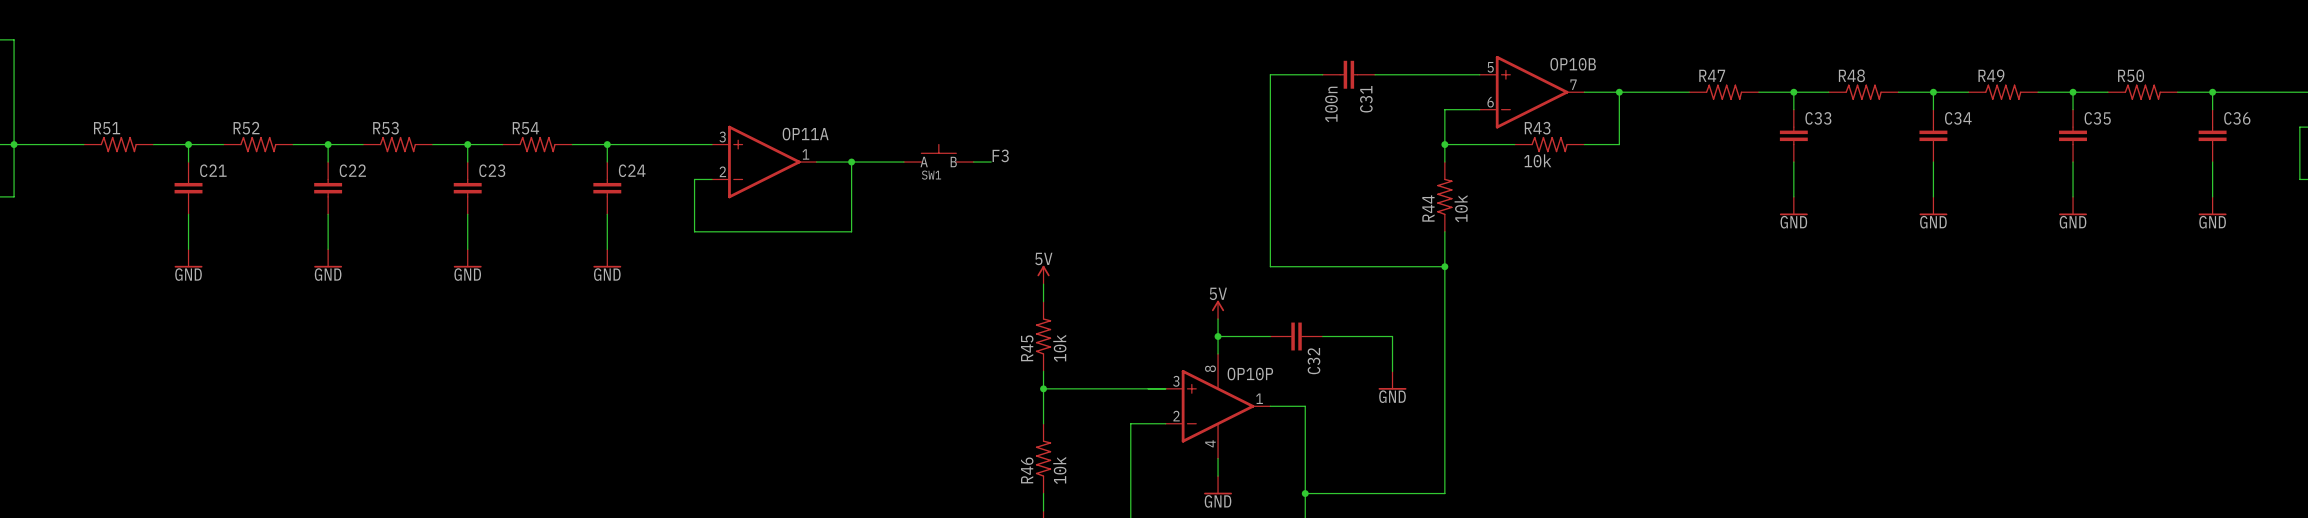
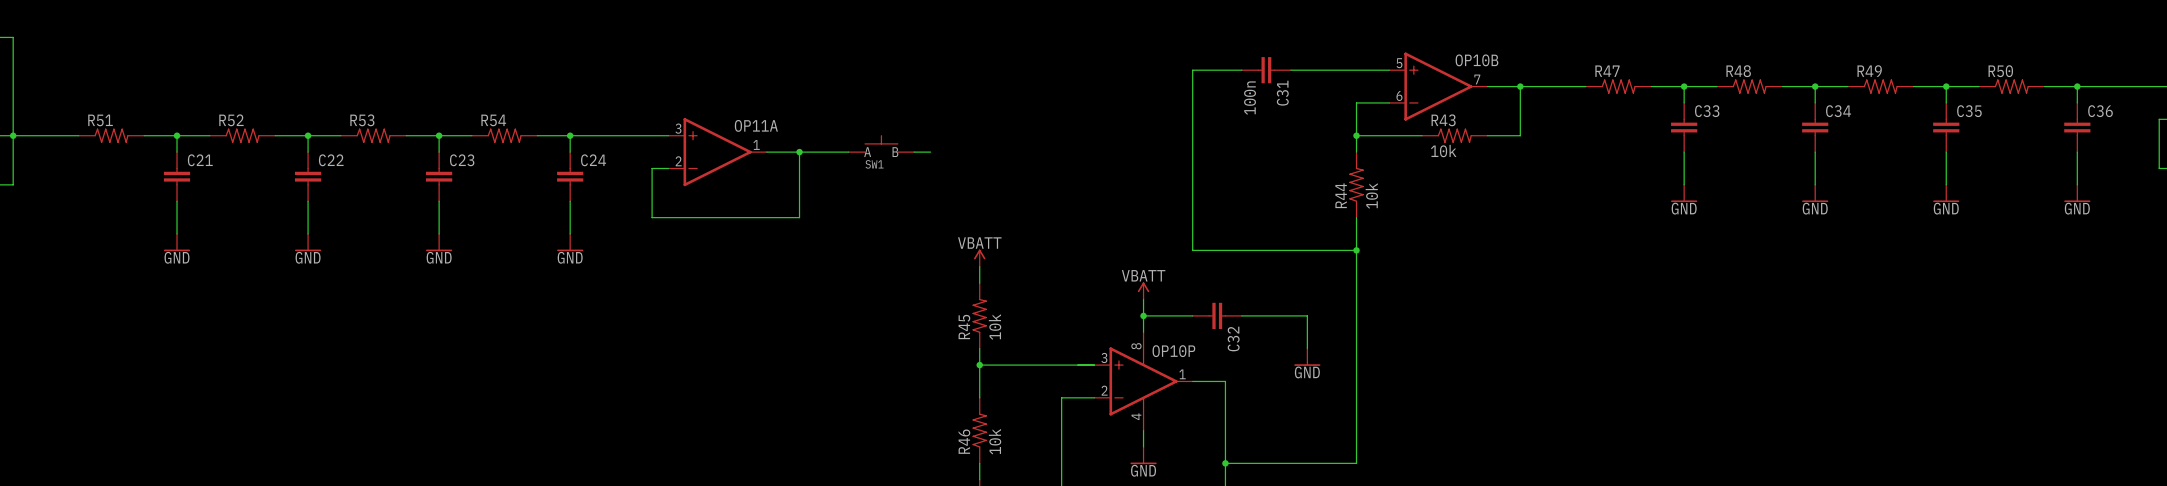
label: F3 (1000, 155) -> none
power symbol: 5V (1043, 275) -> VBATT (979, 258)
power symbol: 5V (1218, 309) -> VBATT (1143, 290)

